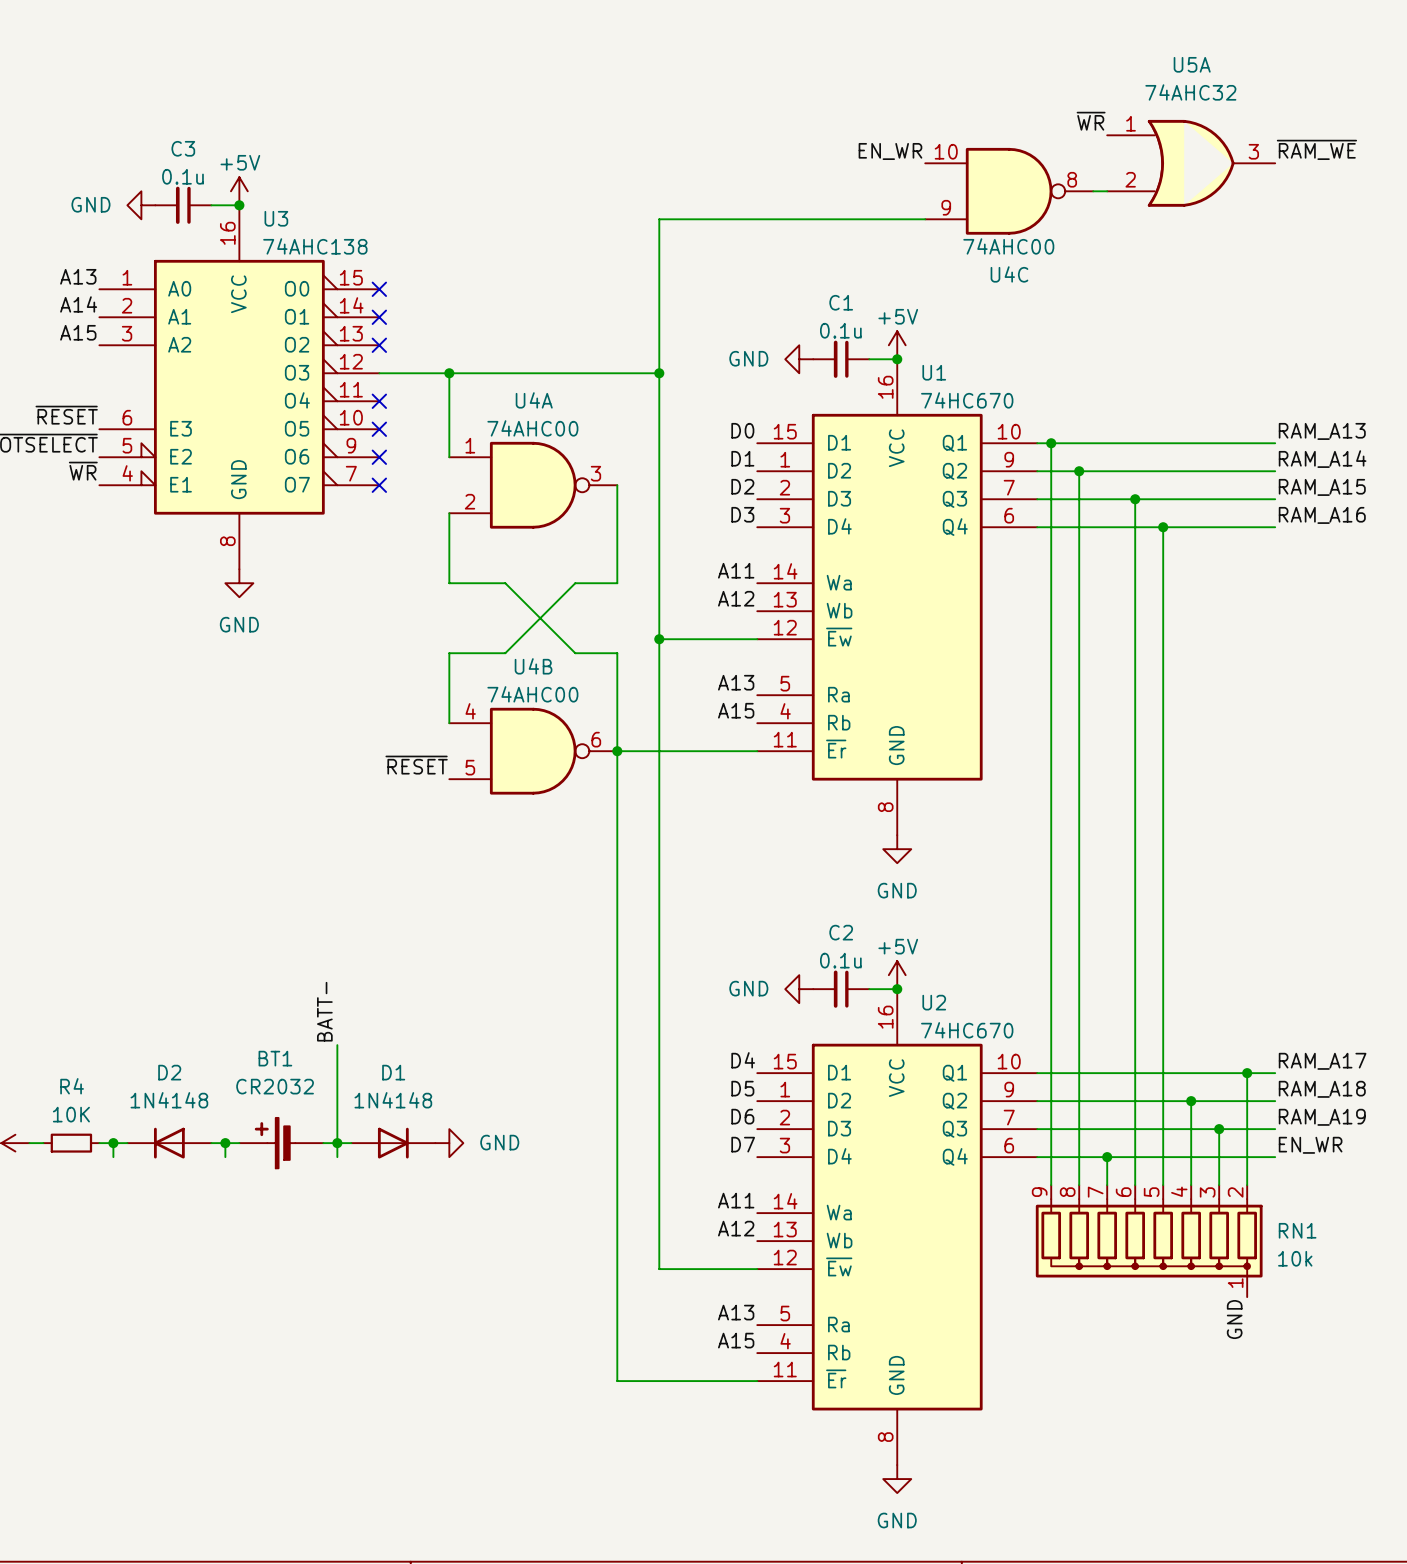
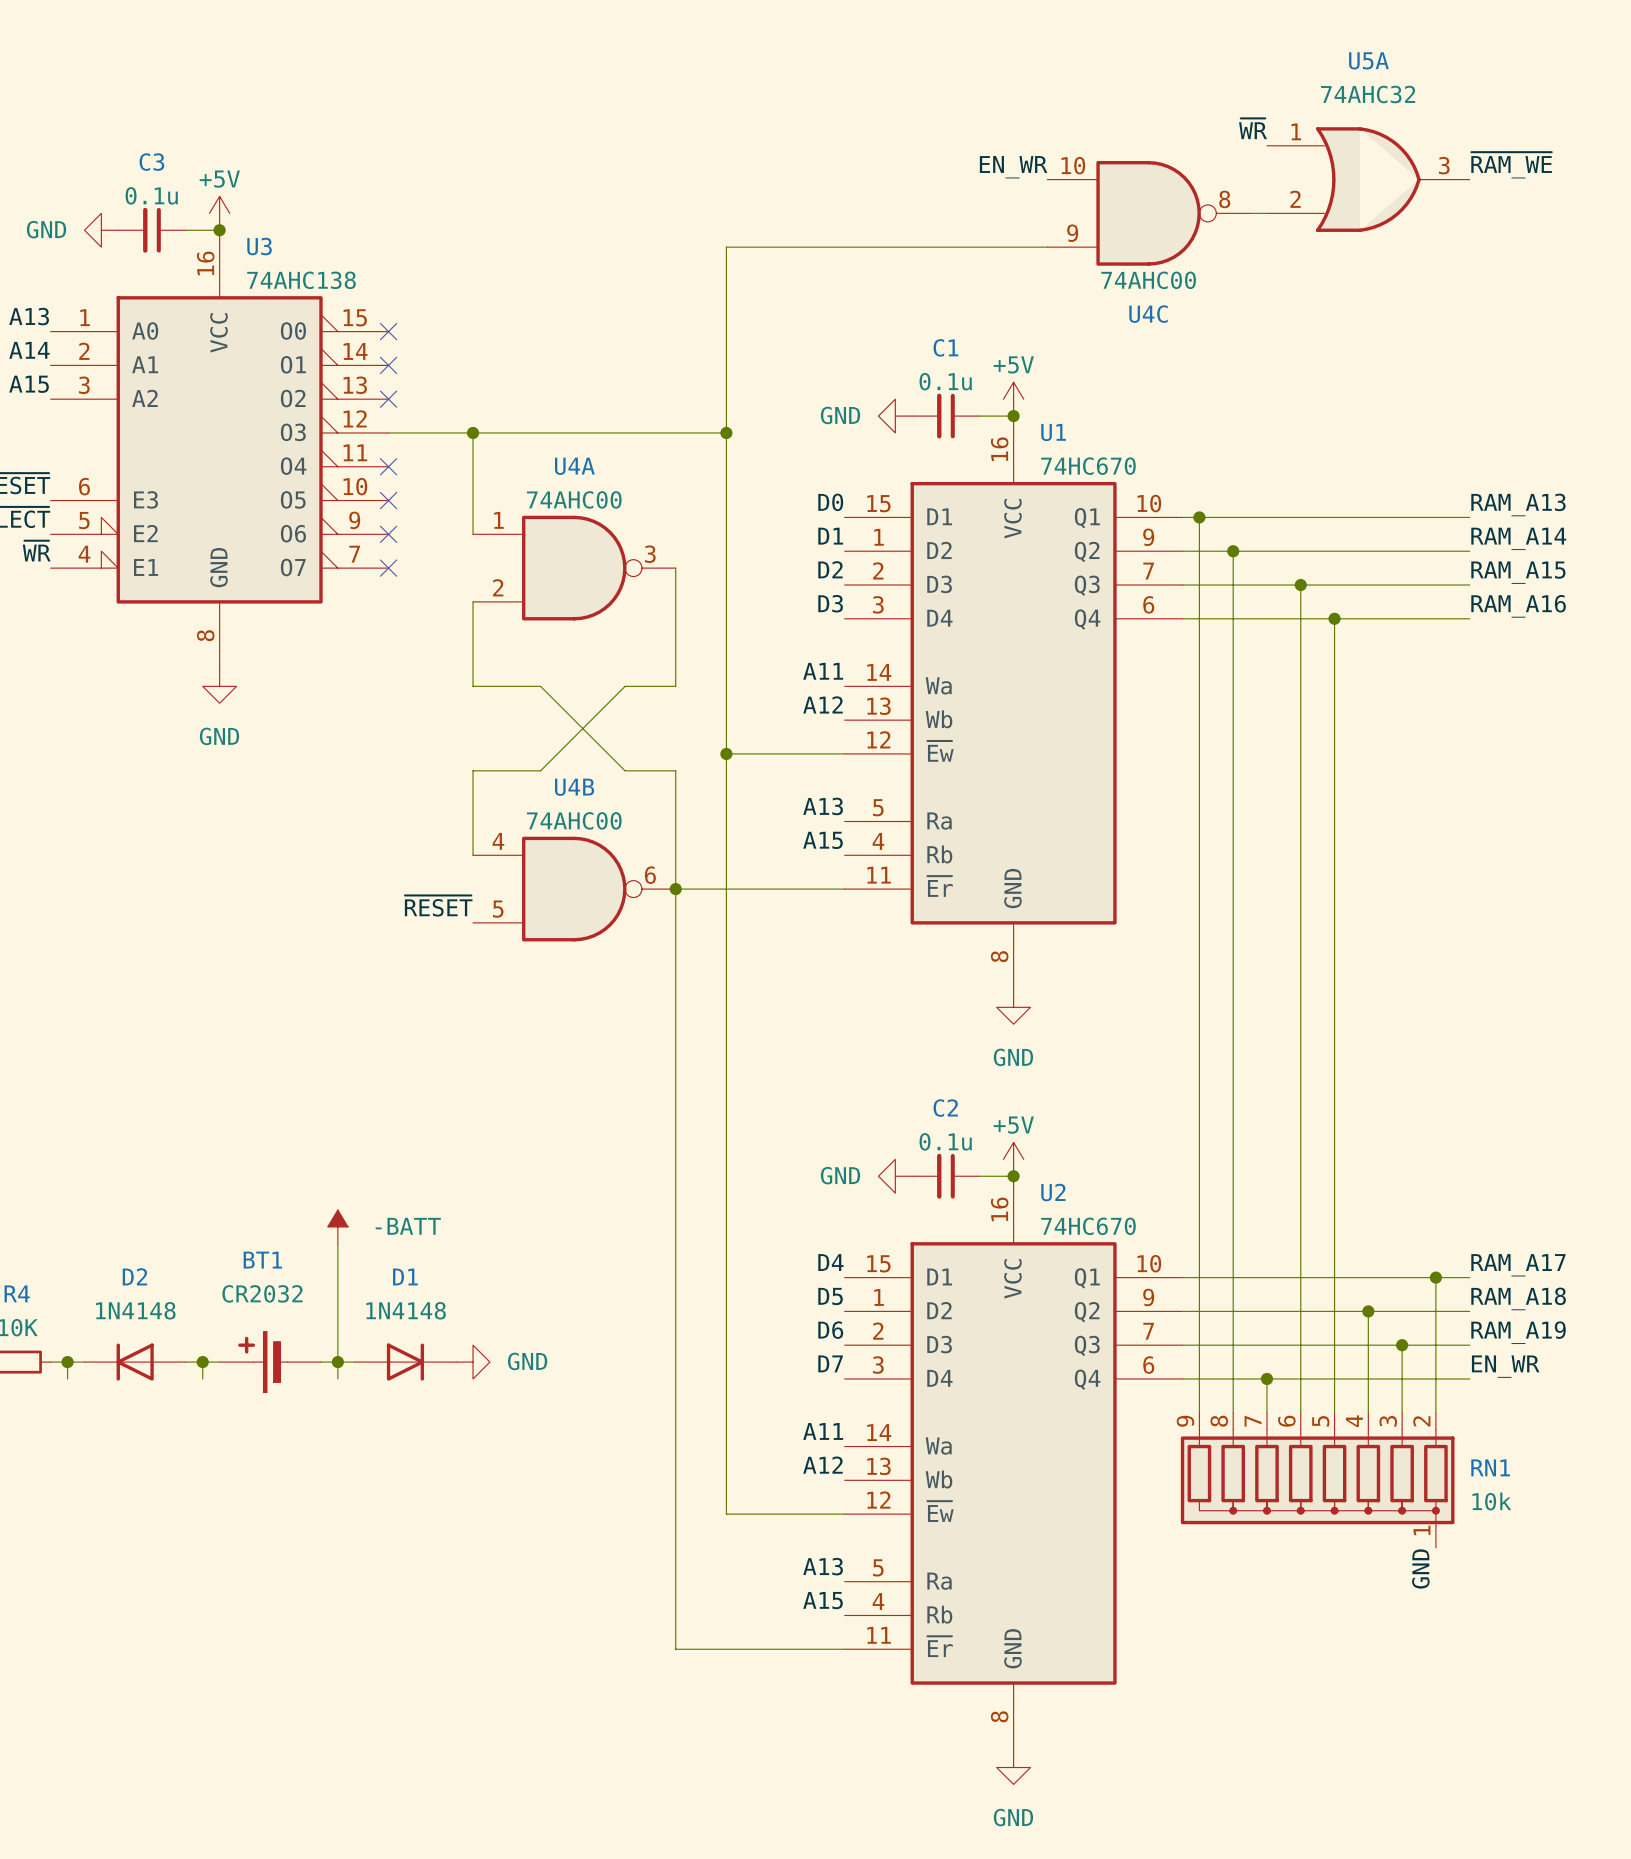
label: BATT- (324, 1011) -> none
power symbol: none -> -BATT (337, 1226)

